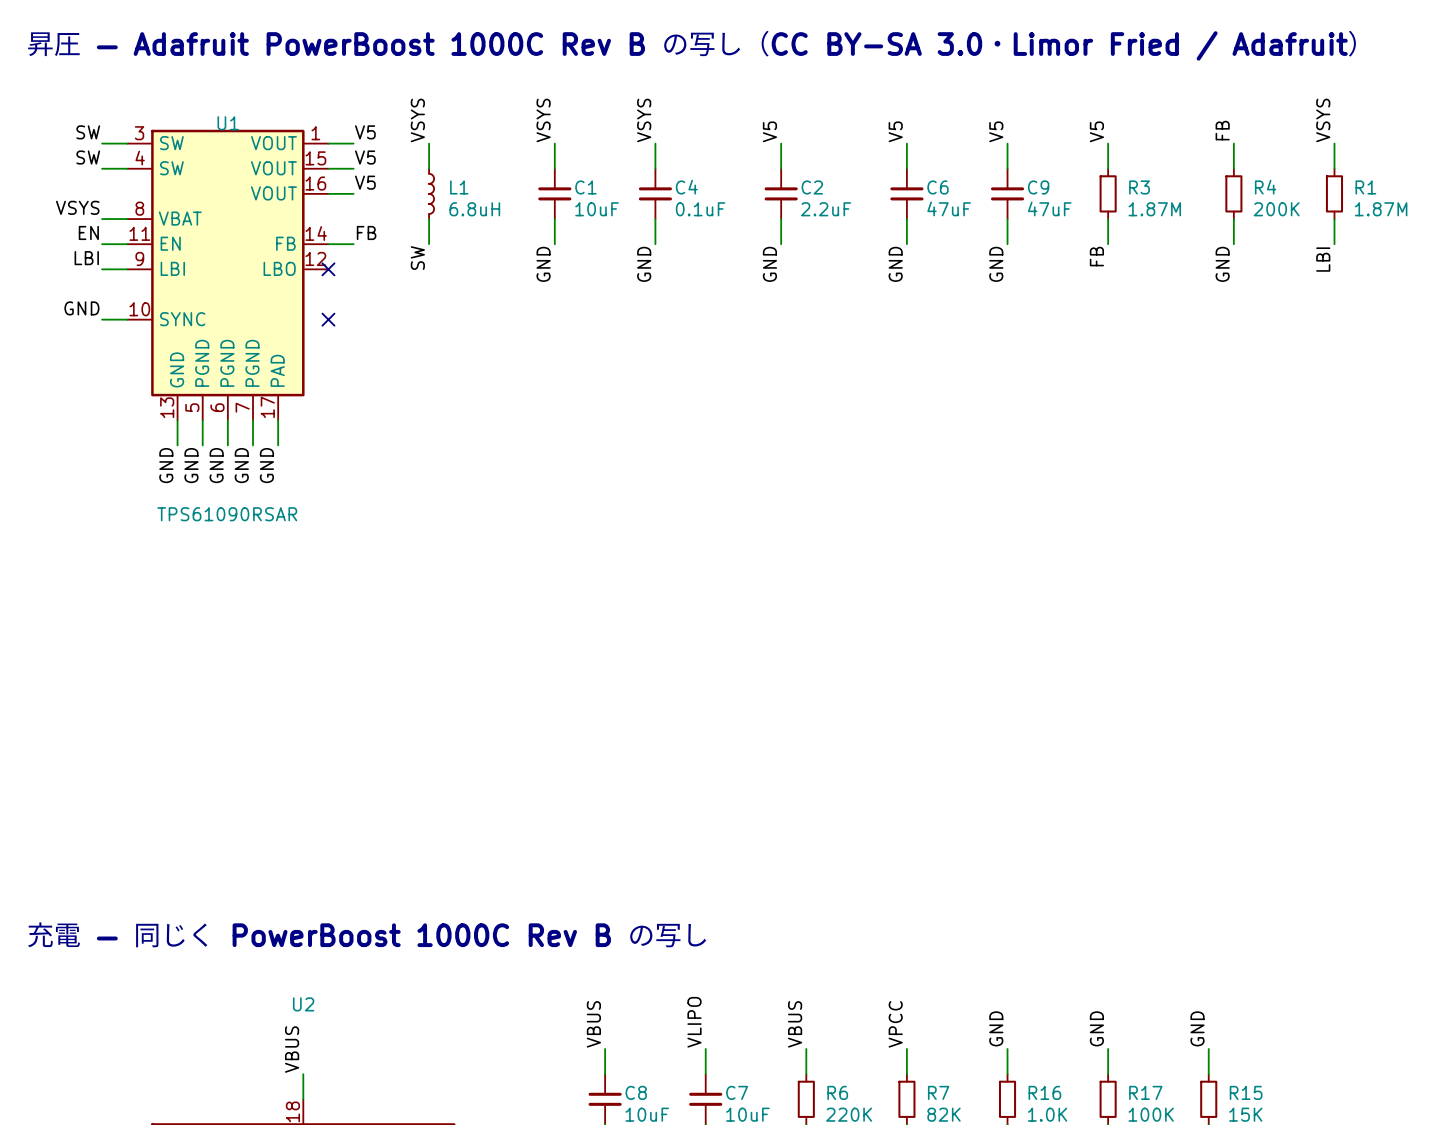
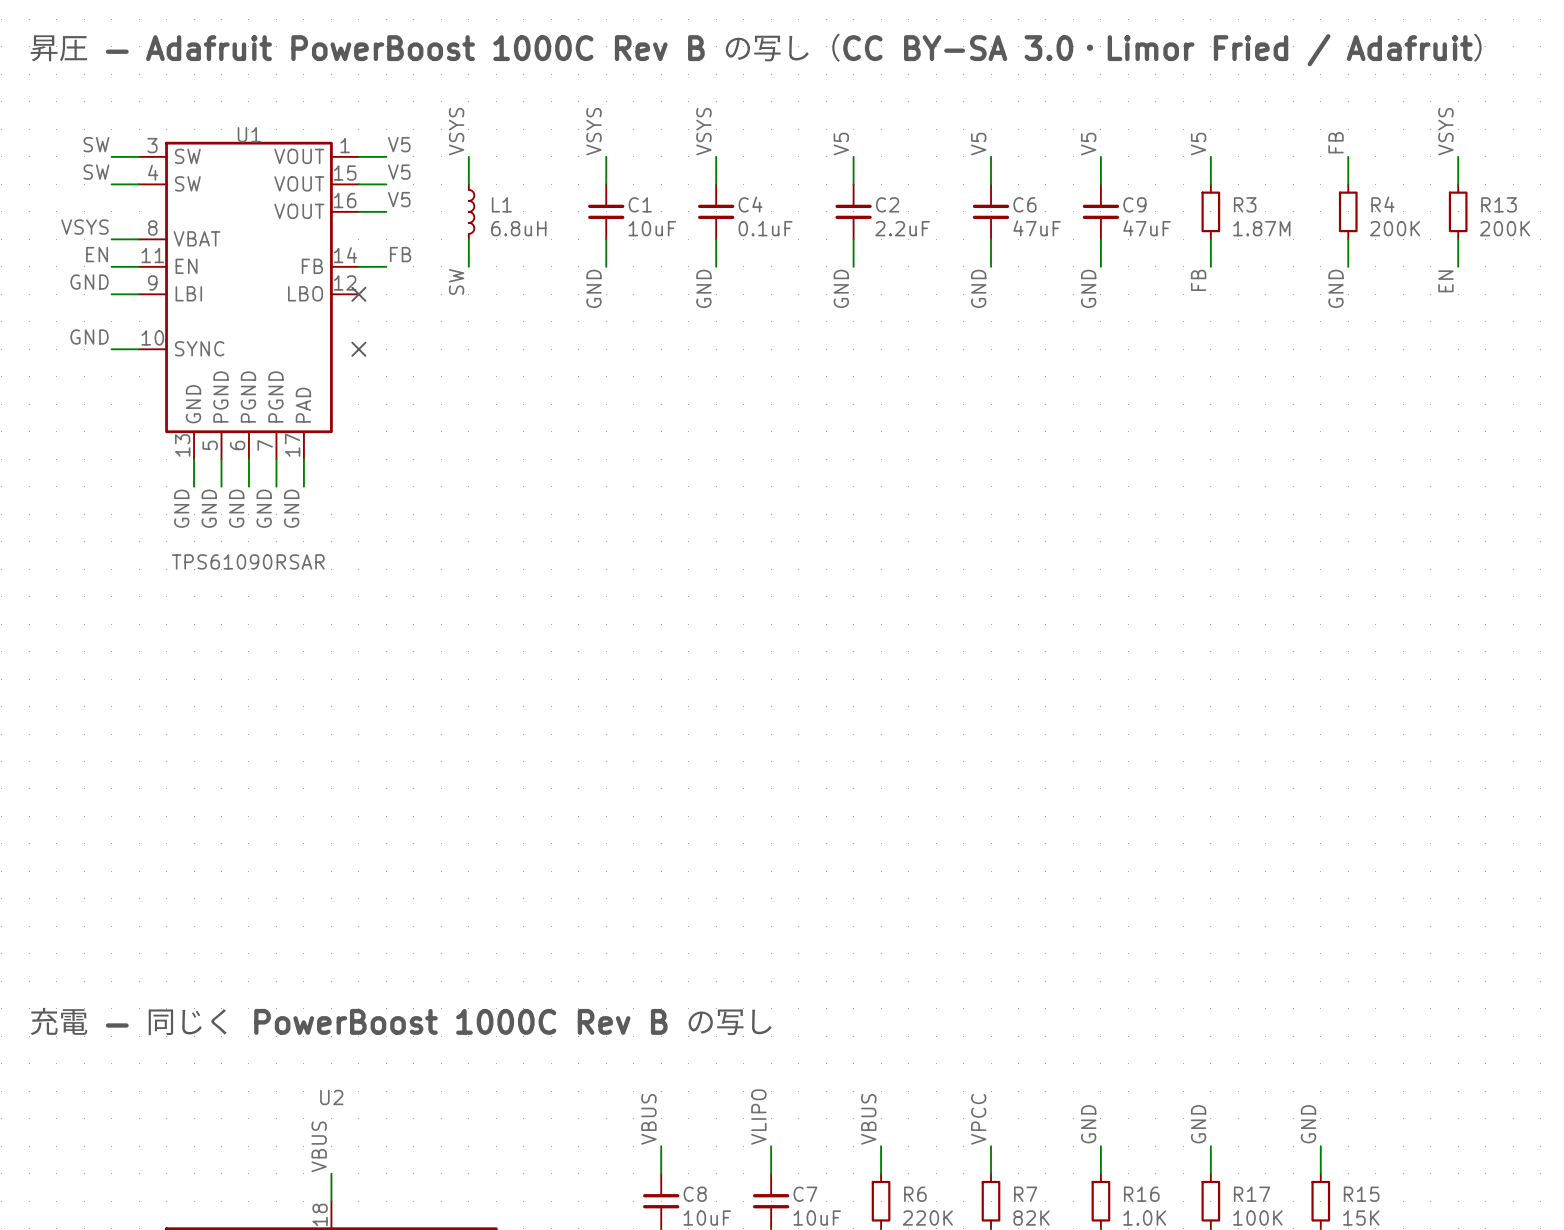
R1 name: R1 (1365, 187) -> R13 (1499, 204)
R1 value: 1.87M (1381, 209) -> 200K (1504, 228)
label: LBI (86, 258) -> GND (89, 282)
label: LBI (1323, 259) -> EN (1445, 281)

